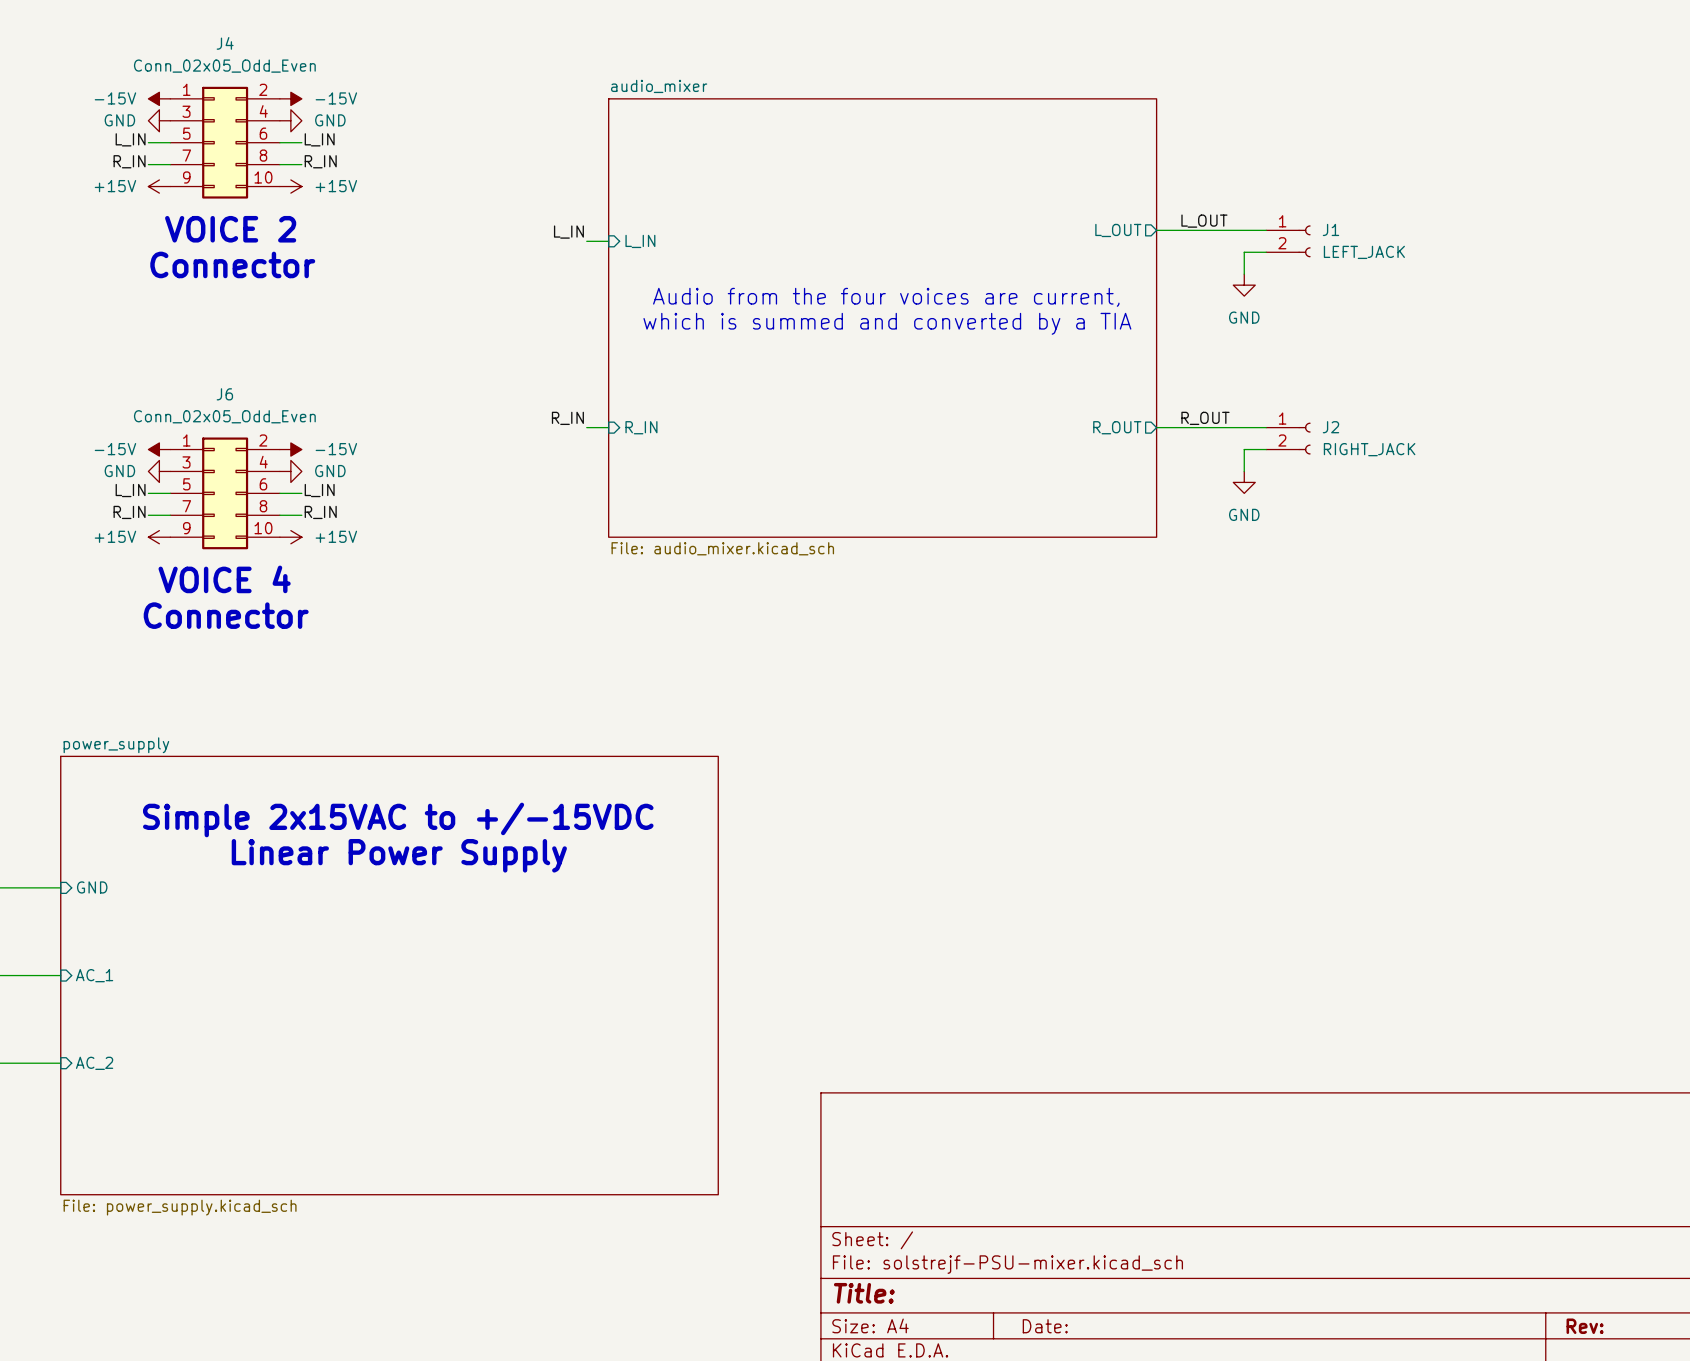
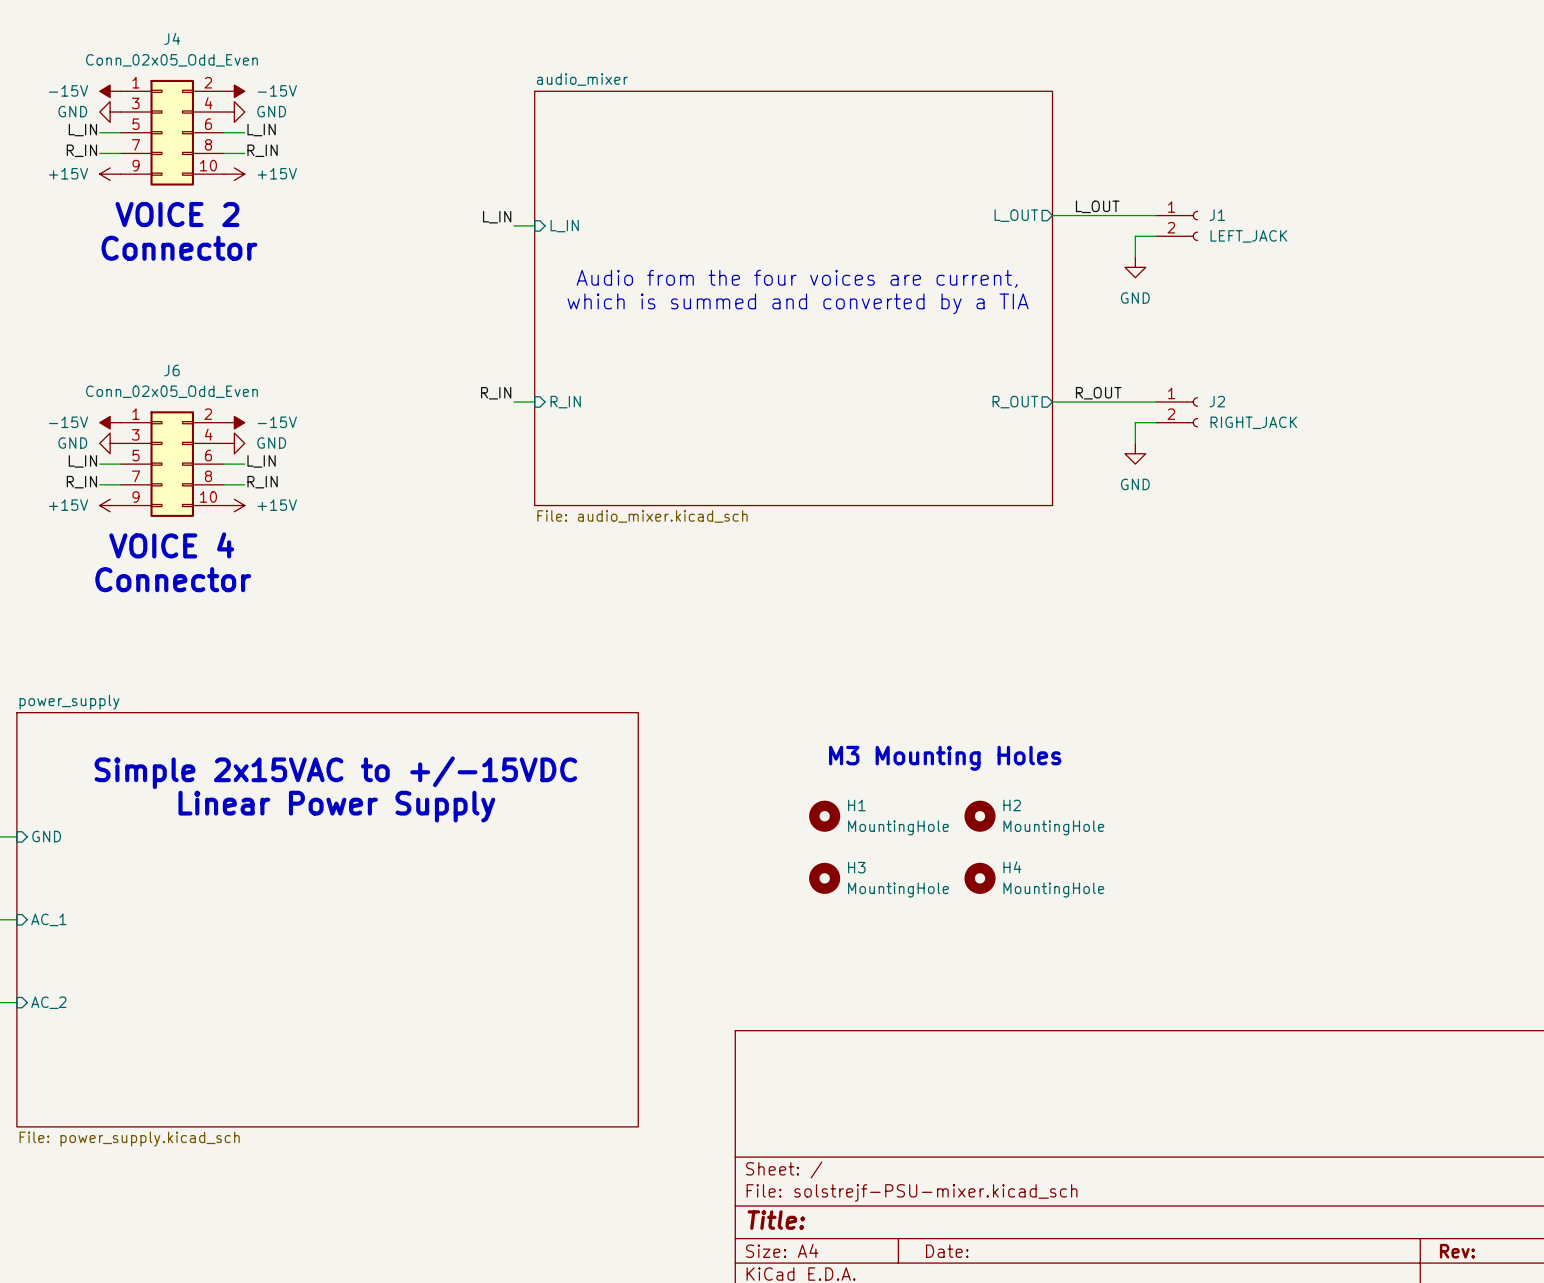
text: none -> M3 Mounting Holes (945, 758)
H1: none -> MountingHole (824, 816)
H2: none -> MountingHole (980, 816)
H3: none -> MountingHole (824, 878)
H4: none -> MountingHole (980, 878)

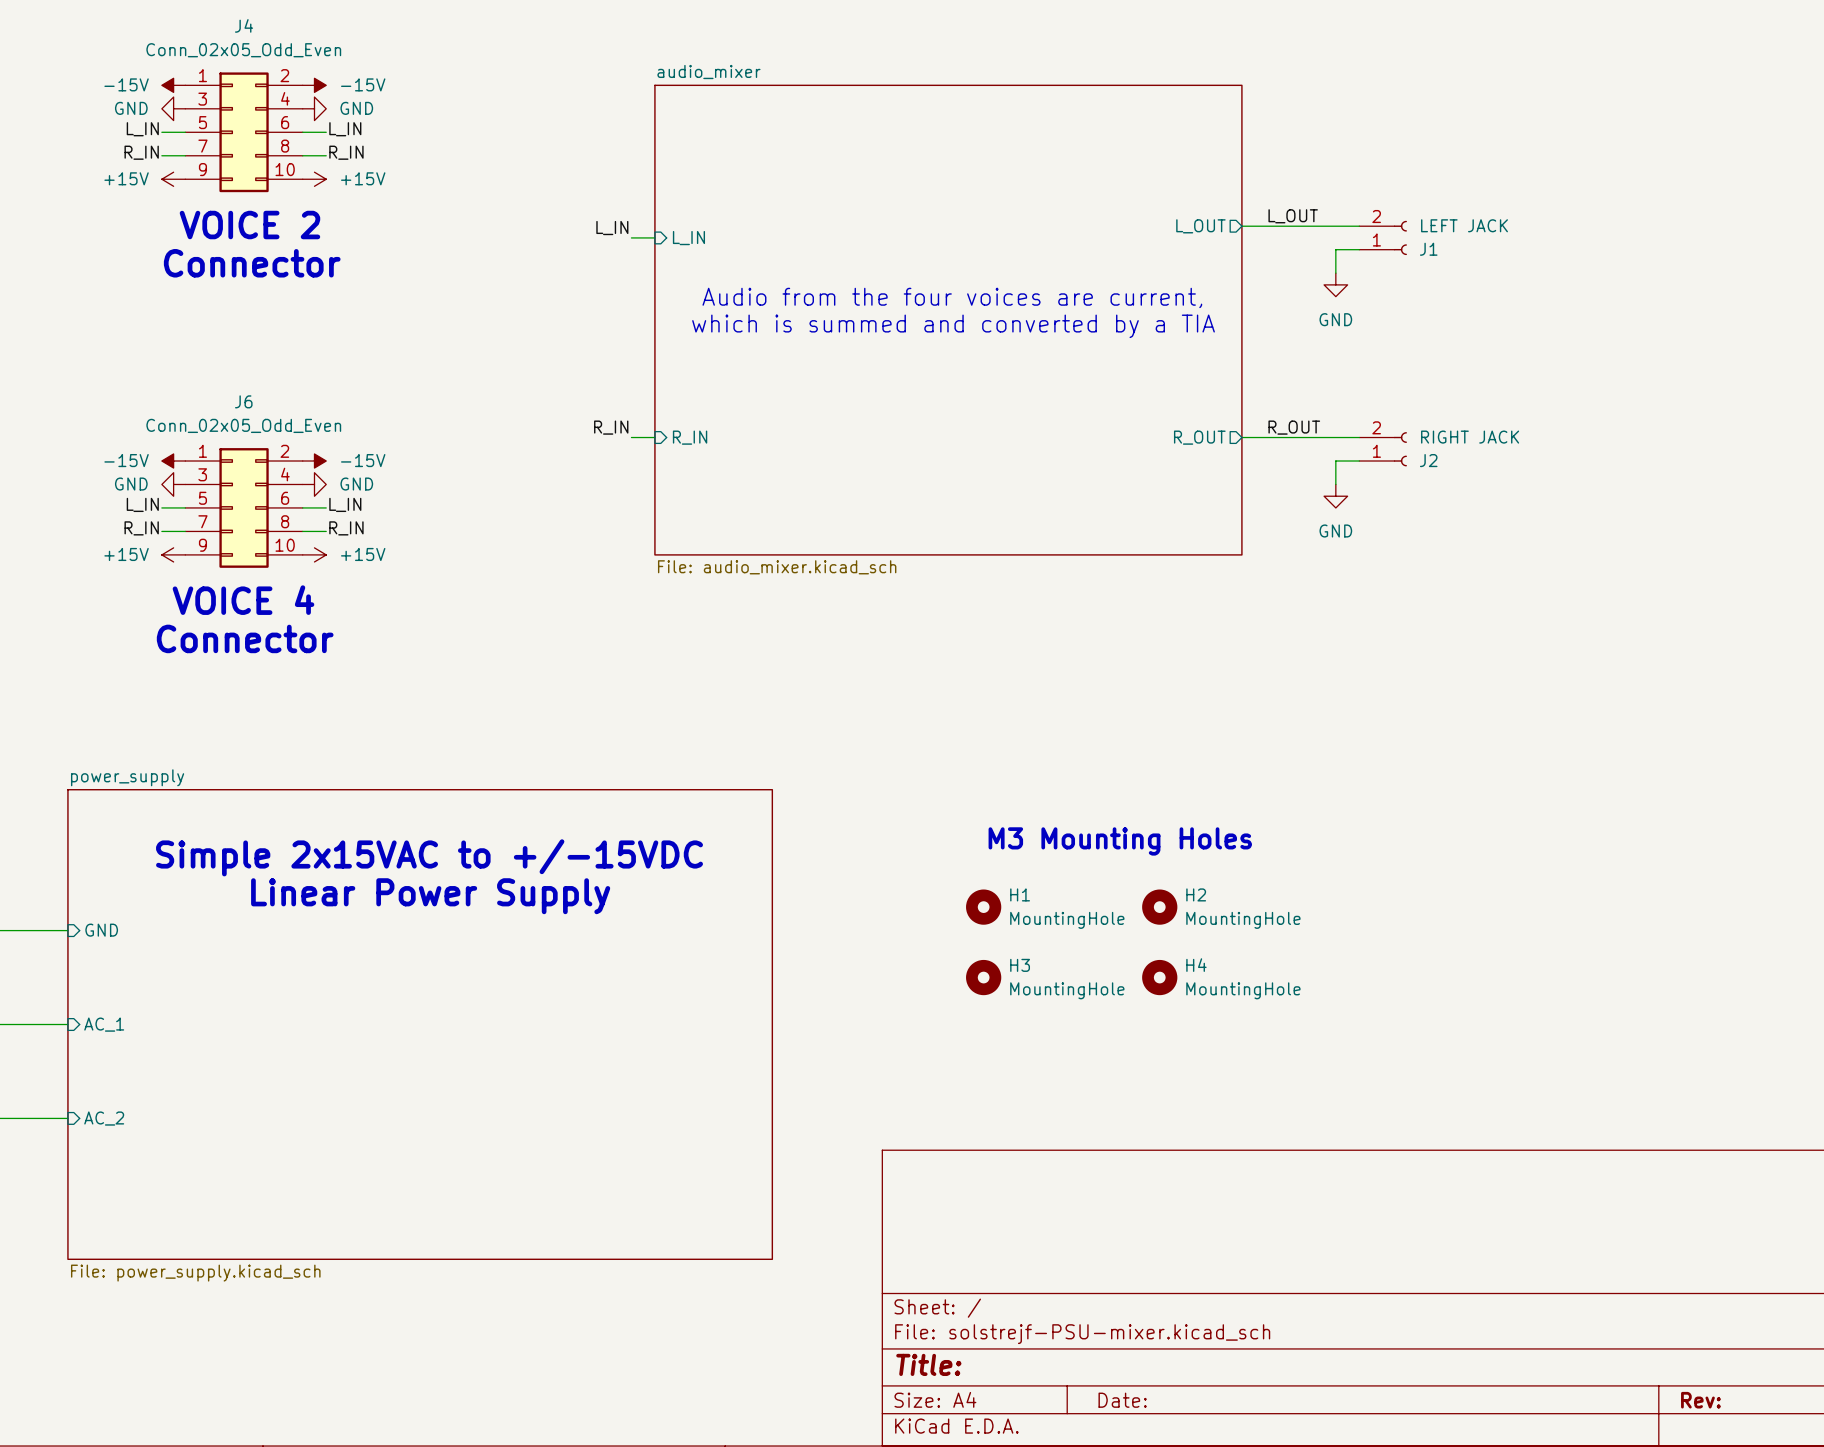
J1 flip: as is (1192, 225) -> up-down (1400, 237)
J1 value: LEFT_JACK (1248, 236) -> LEFT JACK (1464, 225)
J2 flip: as is (1192, 412) -> up-down (1400, 449)
J2 value: RIGHT_JACK (1253, 422) -> RIGHT JACK (1470, 437)

